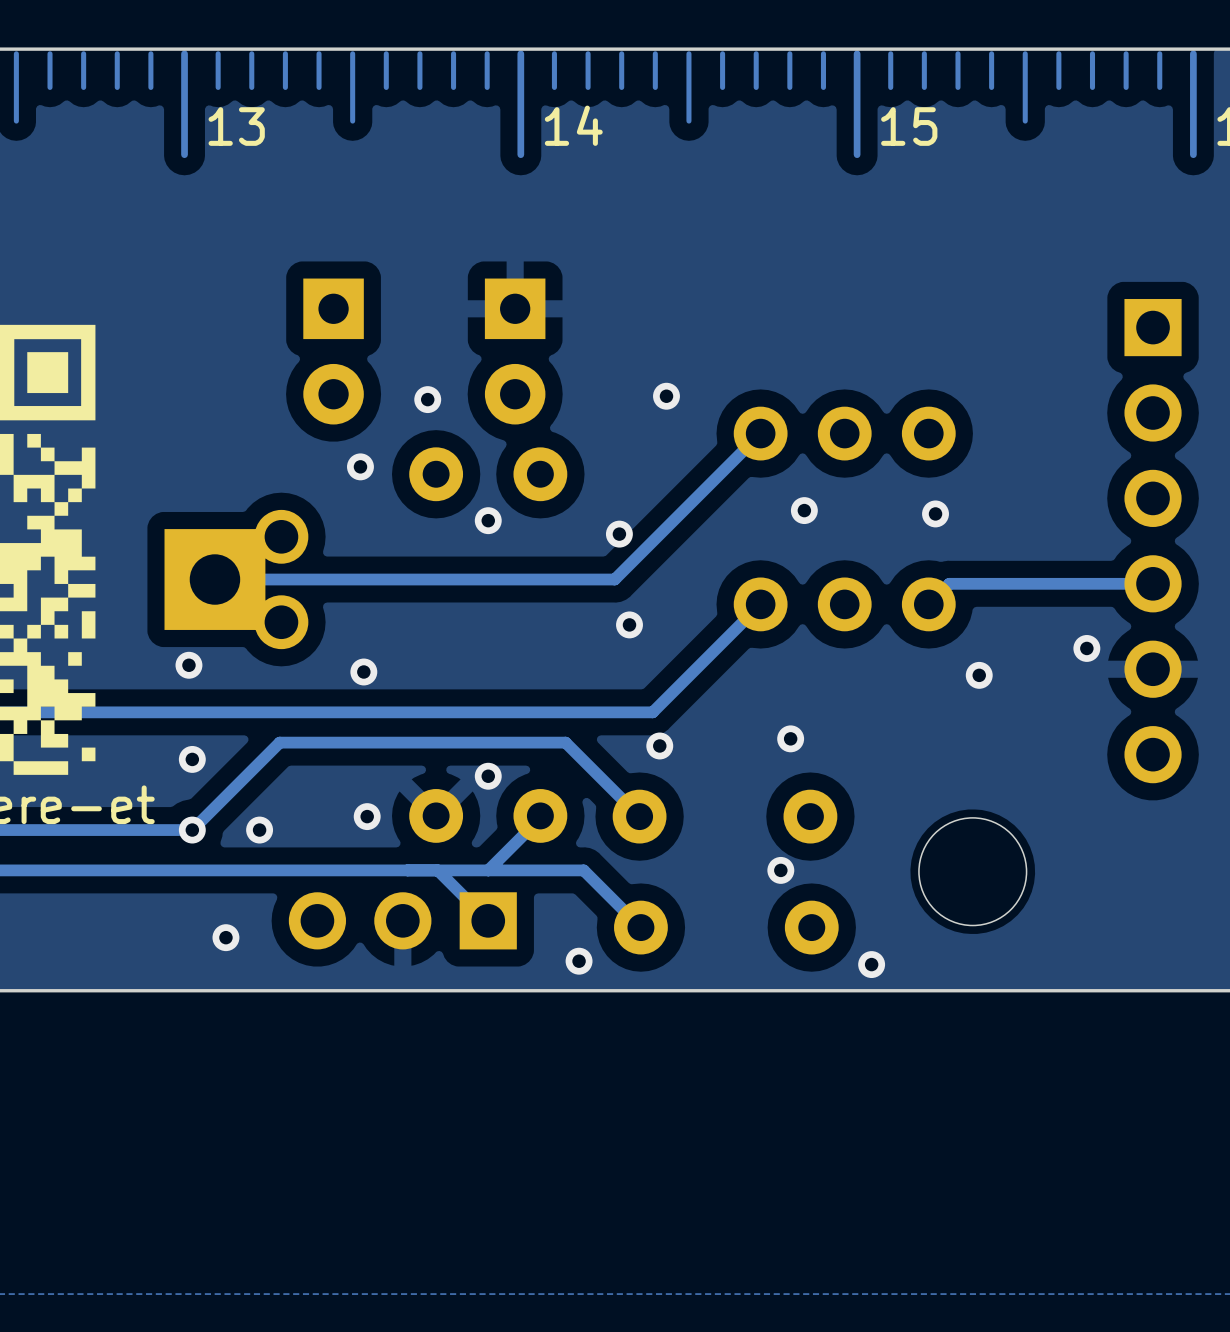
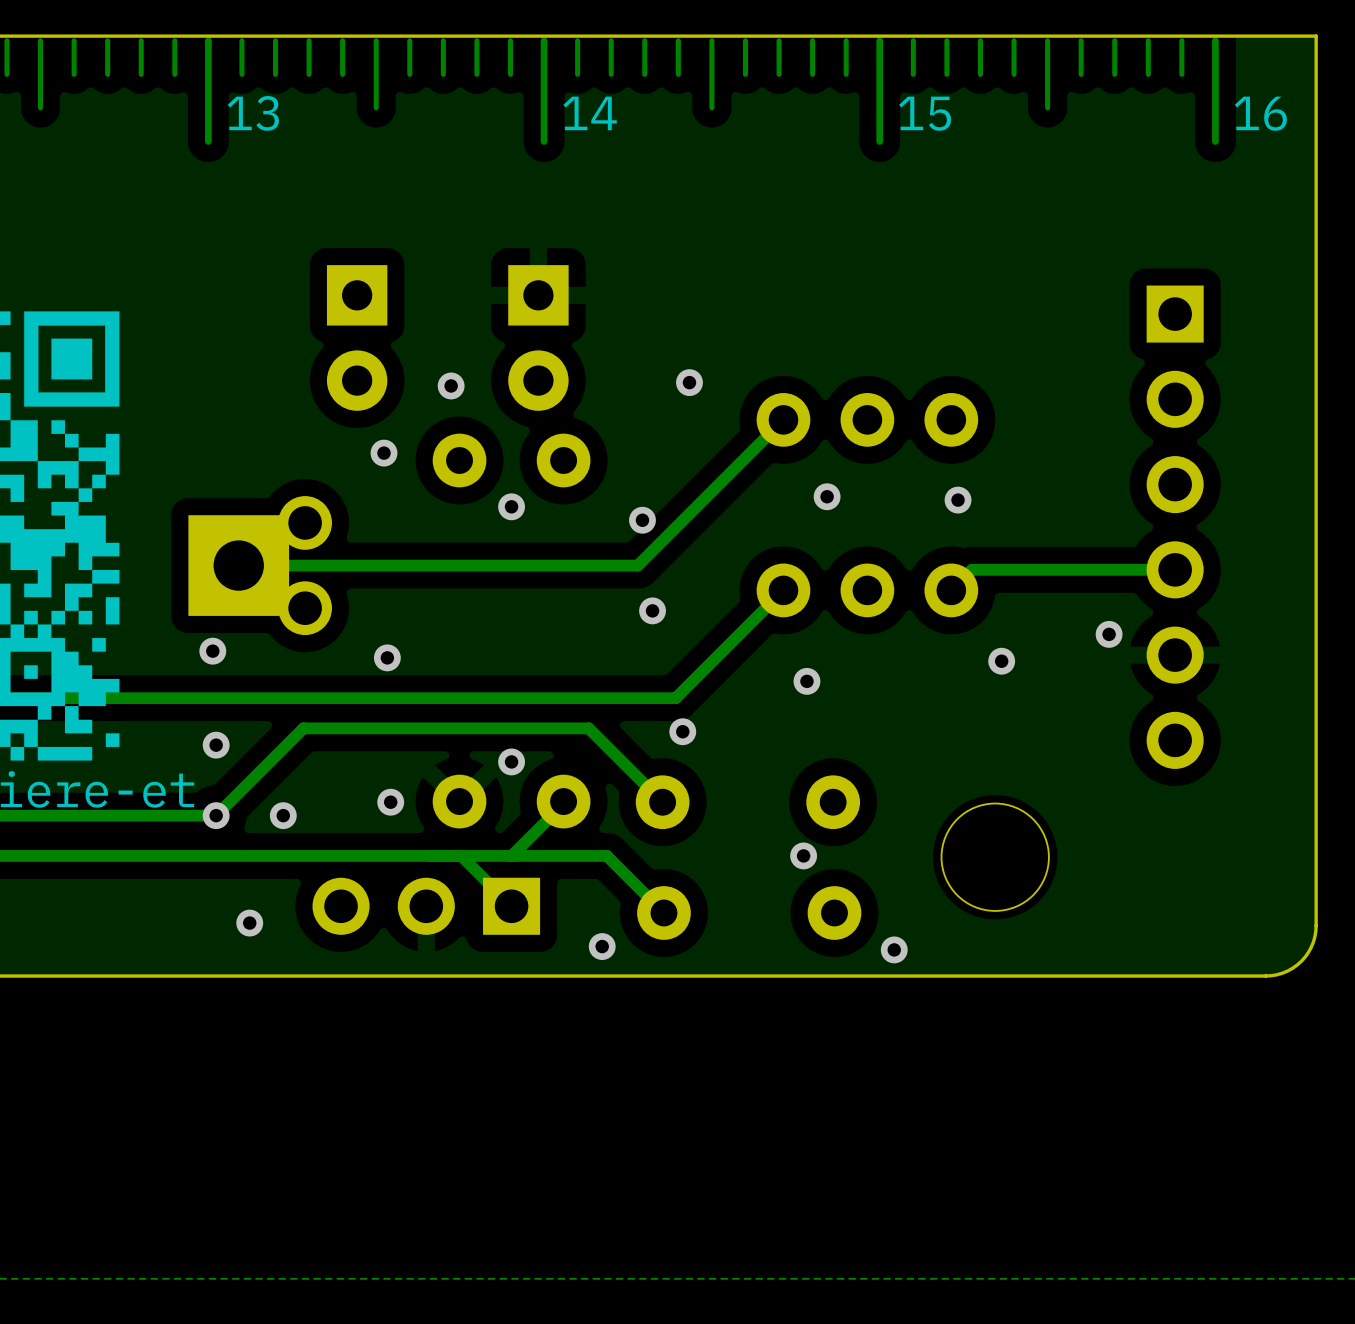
via position: (790, 738) -> (806, 681)

